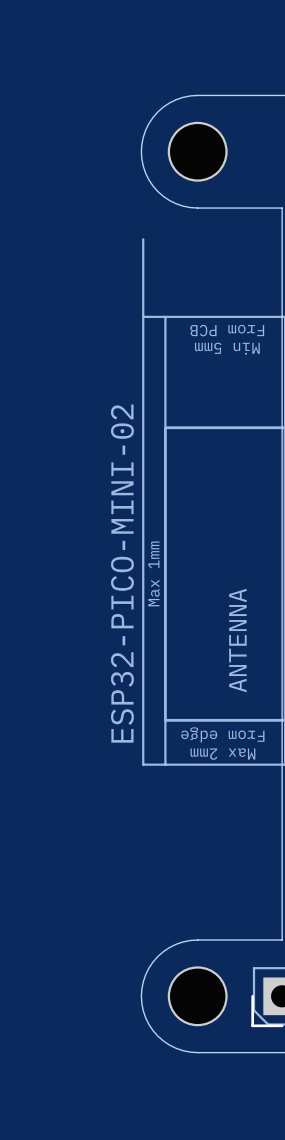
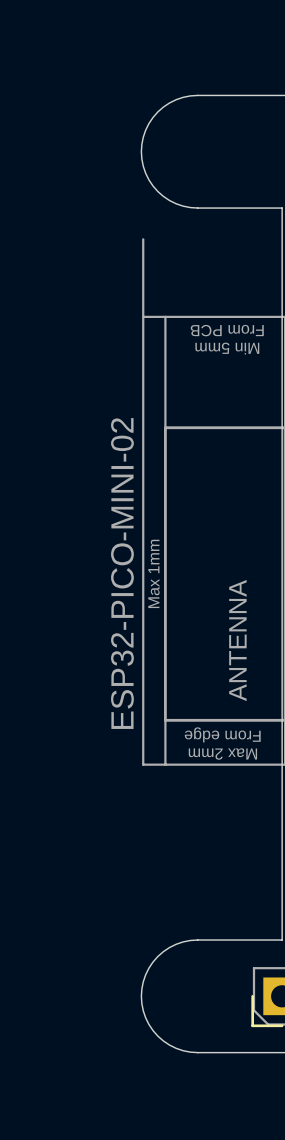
part: (197, 151) -> none
part: (197, 996) -> none

